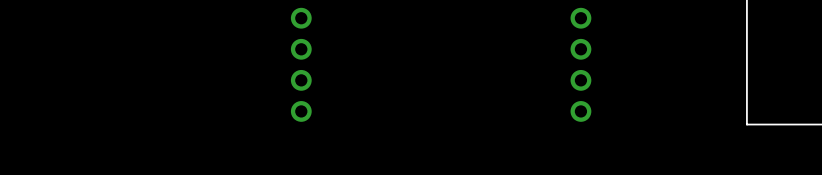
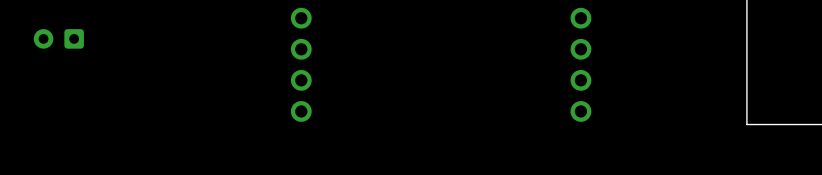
part: none -> (58, 38)

